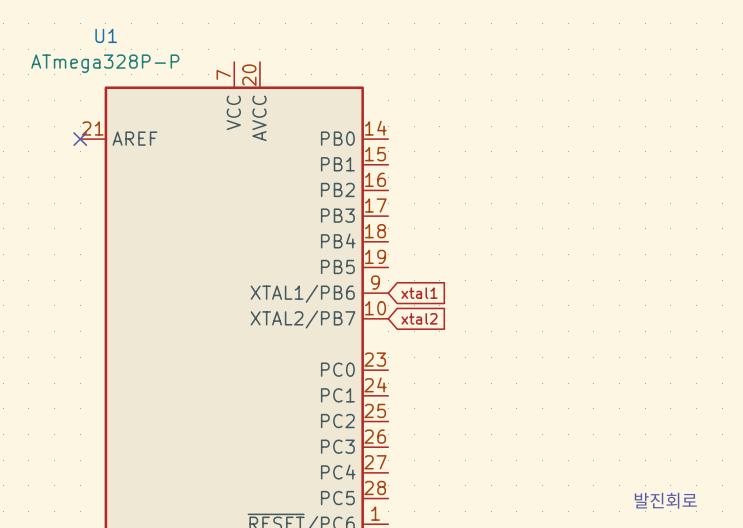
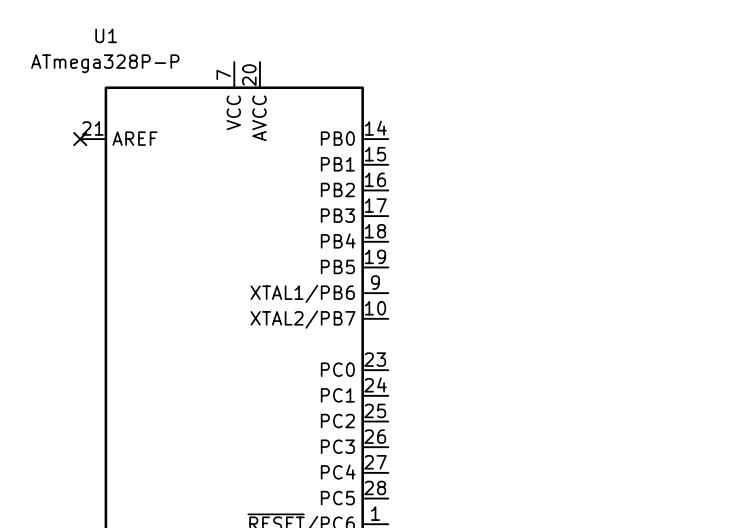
global label: xtal1 (419, 293) -> none
global label: xtal2 (419, 318) -> none
text: 발진회로 (665, 500) -> none

